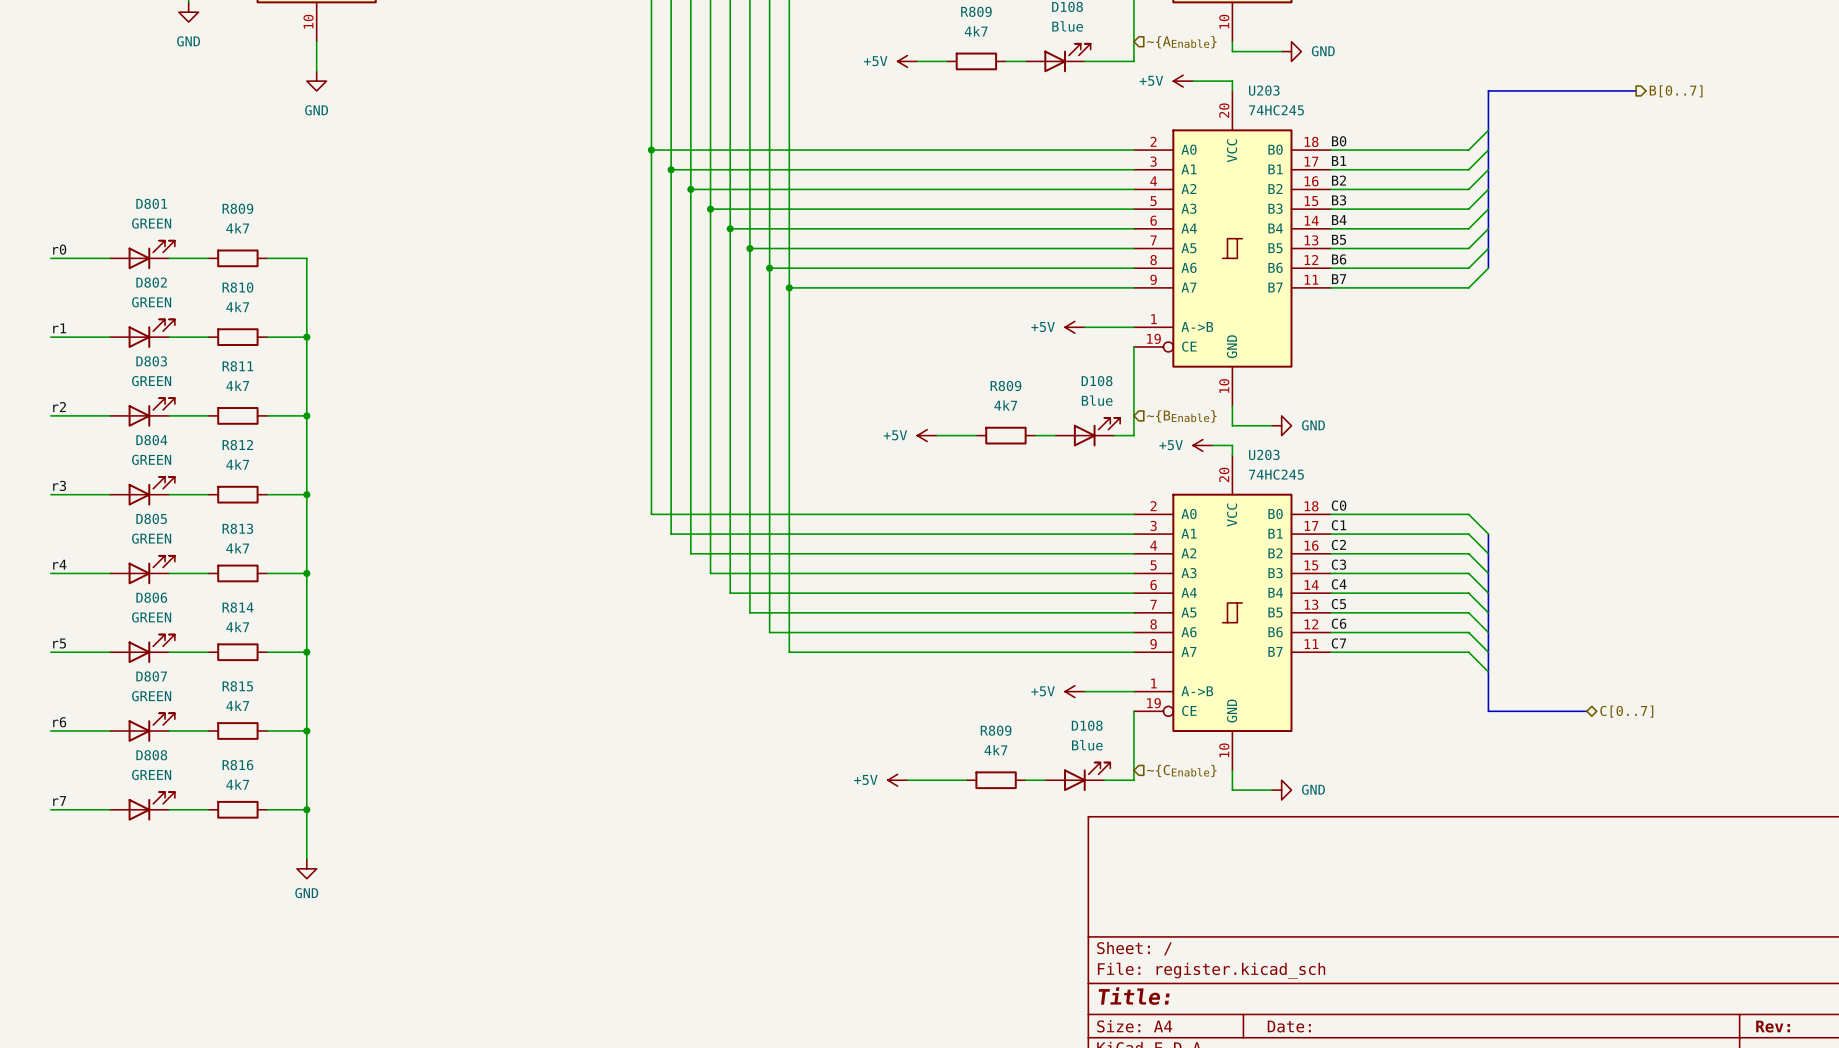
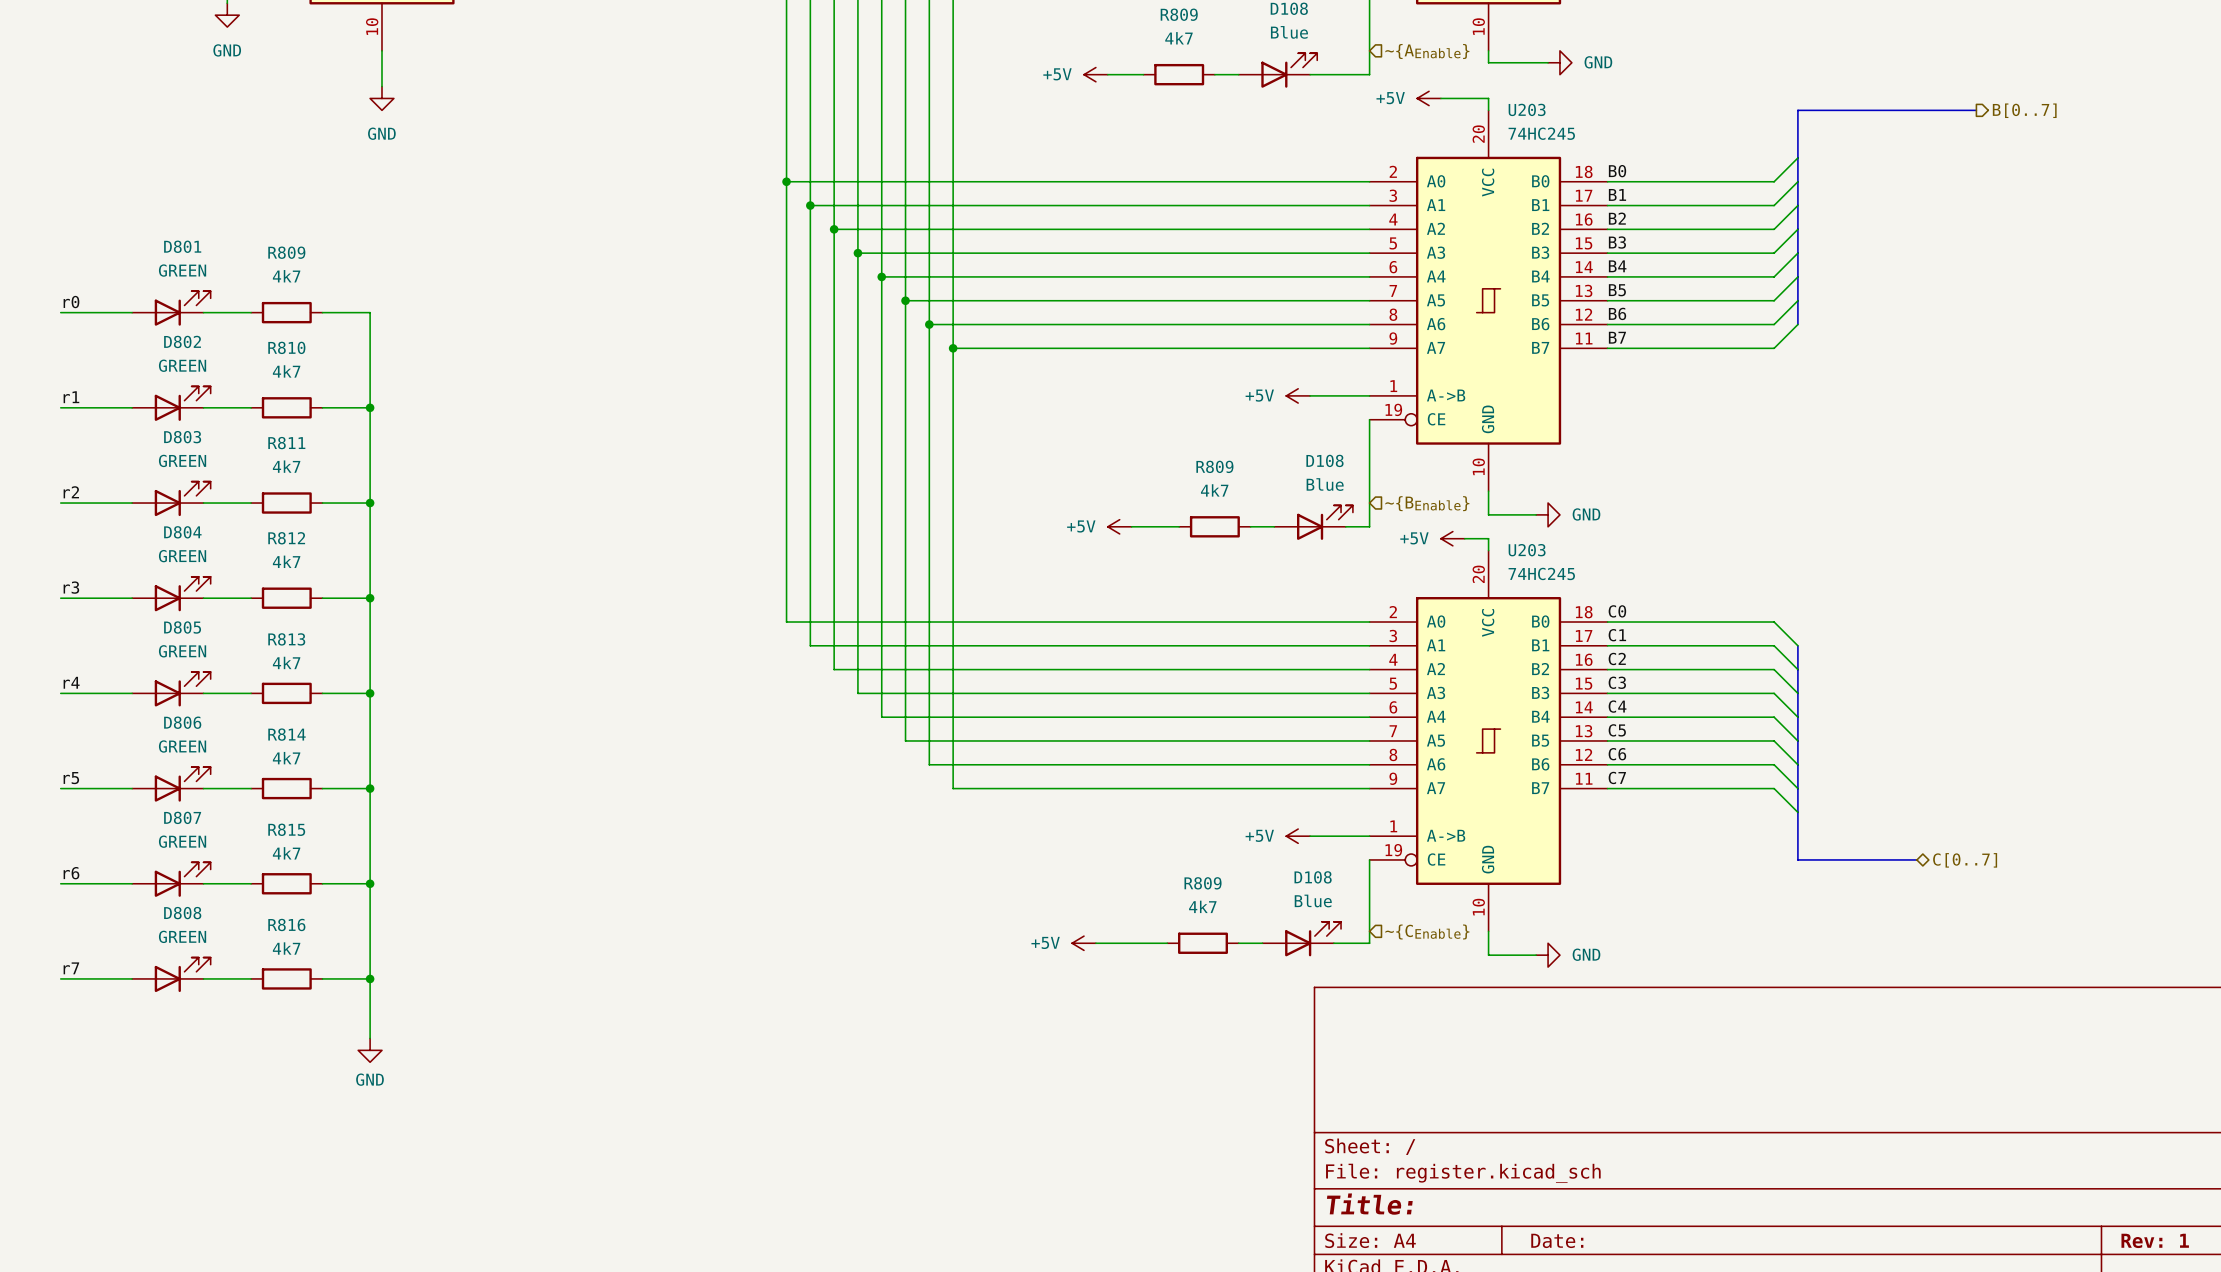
title block: Rev: (1773, 1026) -> Rev: 1 (2155, 1240)

